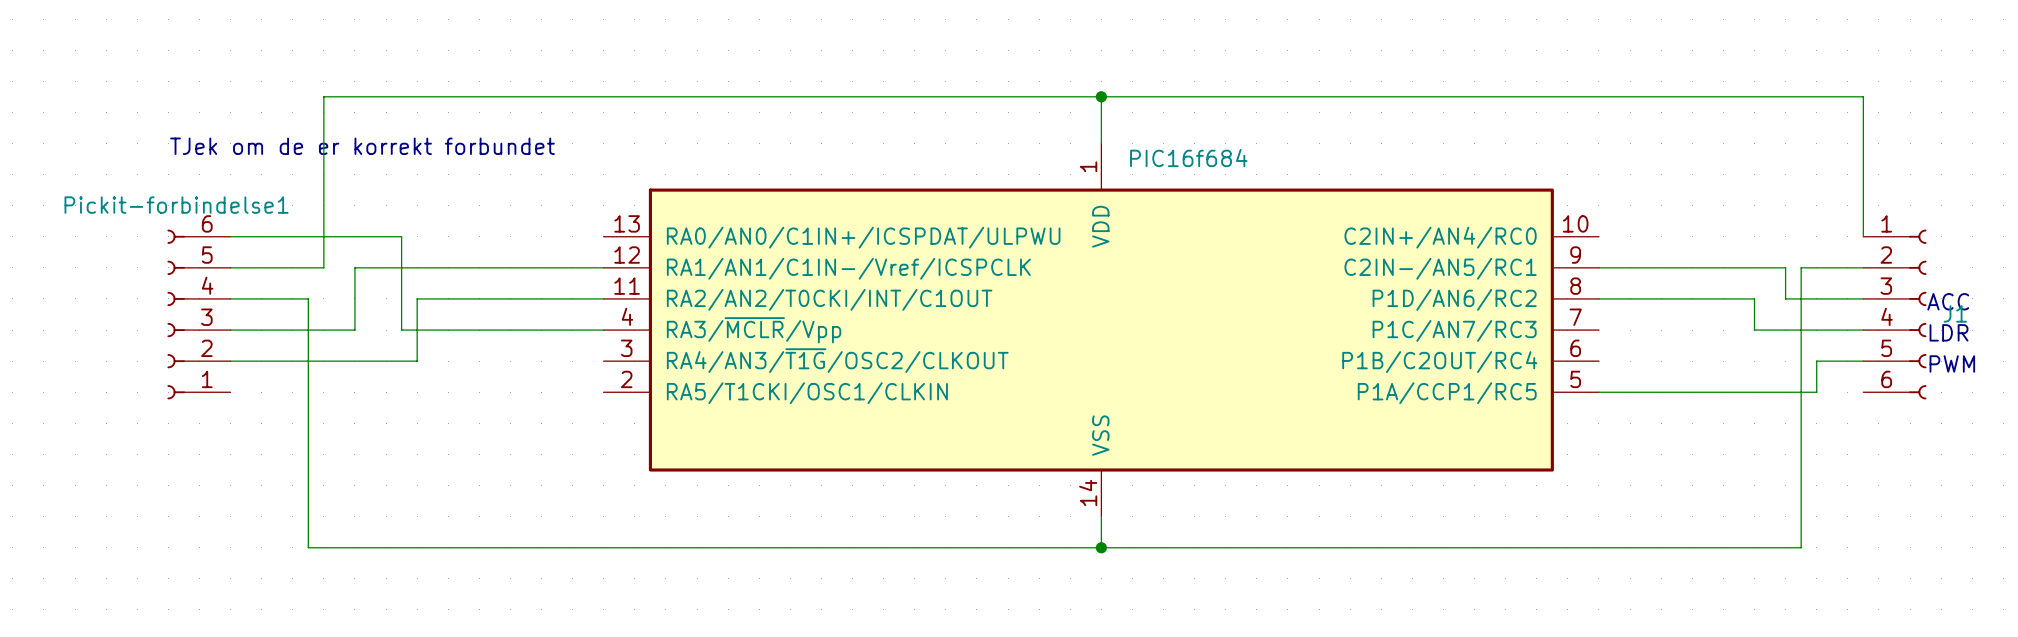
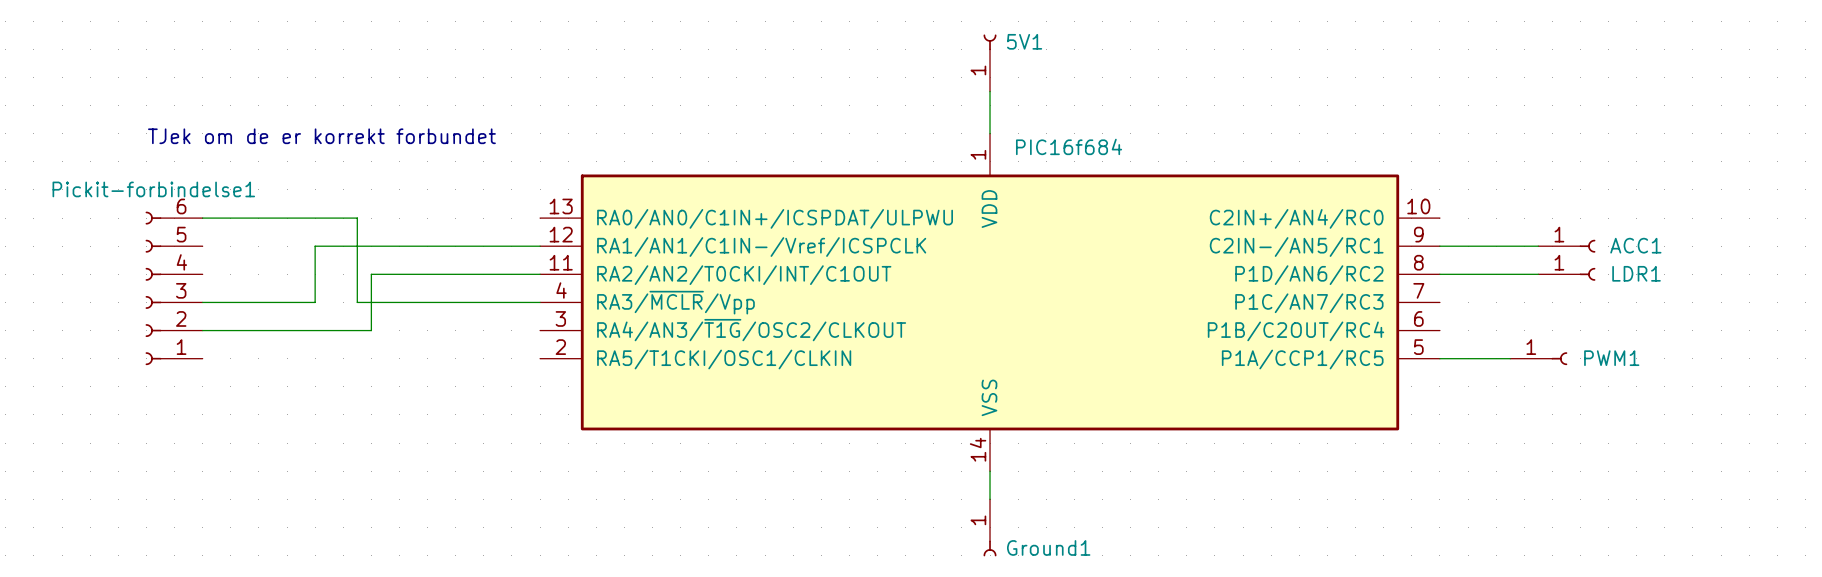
5V1: none -> (990, 63)
junction: (1101, 96) -> none
wire: (1863, 236) (1863, 96) (323, 96) (323, 267) (230, 267) -> none
wire: (1707, 267) (1785, 267) (1785, 298) (1863, 298) -> none
ACC1: none -> (1566, 246)
wire: (1863, 267) (1801, 267) (1801, 547) (308, 547) (308, 298) (230, 298) -> none
wire: (1707, 298) (1754, 298) (1754, 330) (1863, 330) -> none
LDR1: none -> (1566, 274)
text: ACC (1948, 301) -> none
J1: (1894, 314) -> none
text: LDR (1948, 332) -> none
wire: (1863, 361) (1816, 361) (1816, 392) (1676, 392) -> none
text: PWM (1952, 363) -> none
PWM1: none -> (1538, 358)
junction: (1101, 547) -> none
Ground1: none -> (990, 527)

